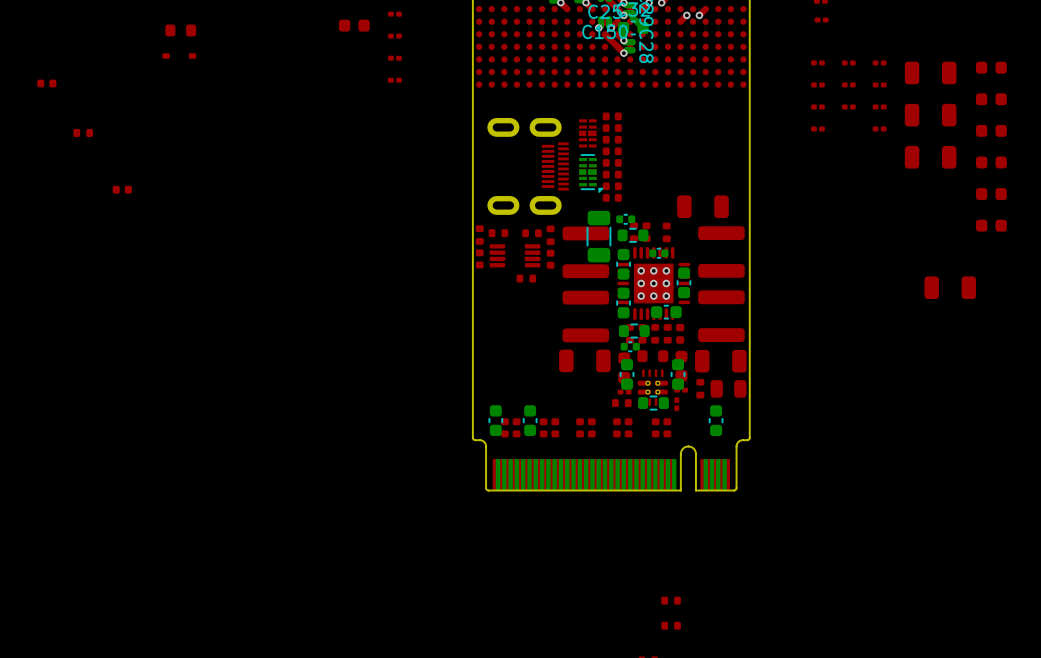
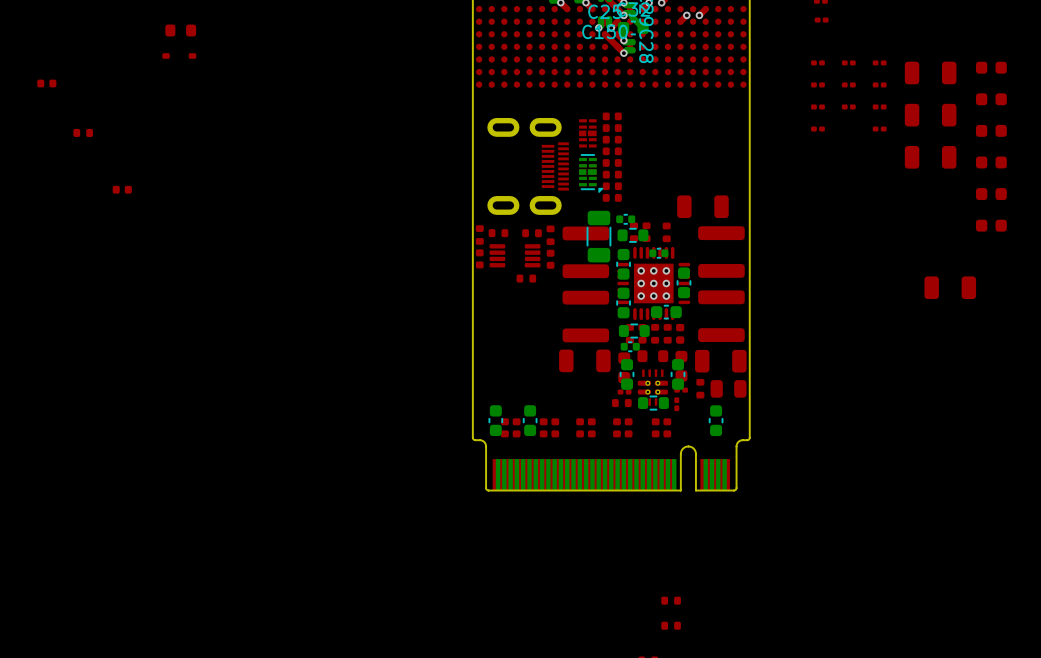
part: (394, 14) -> none
part: (354, 25) -> none
part: (394, 36) -> none
part: (394, 58) -> none
part: (394, 80) -> none

